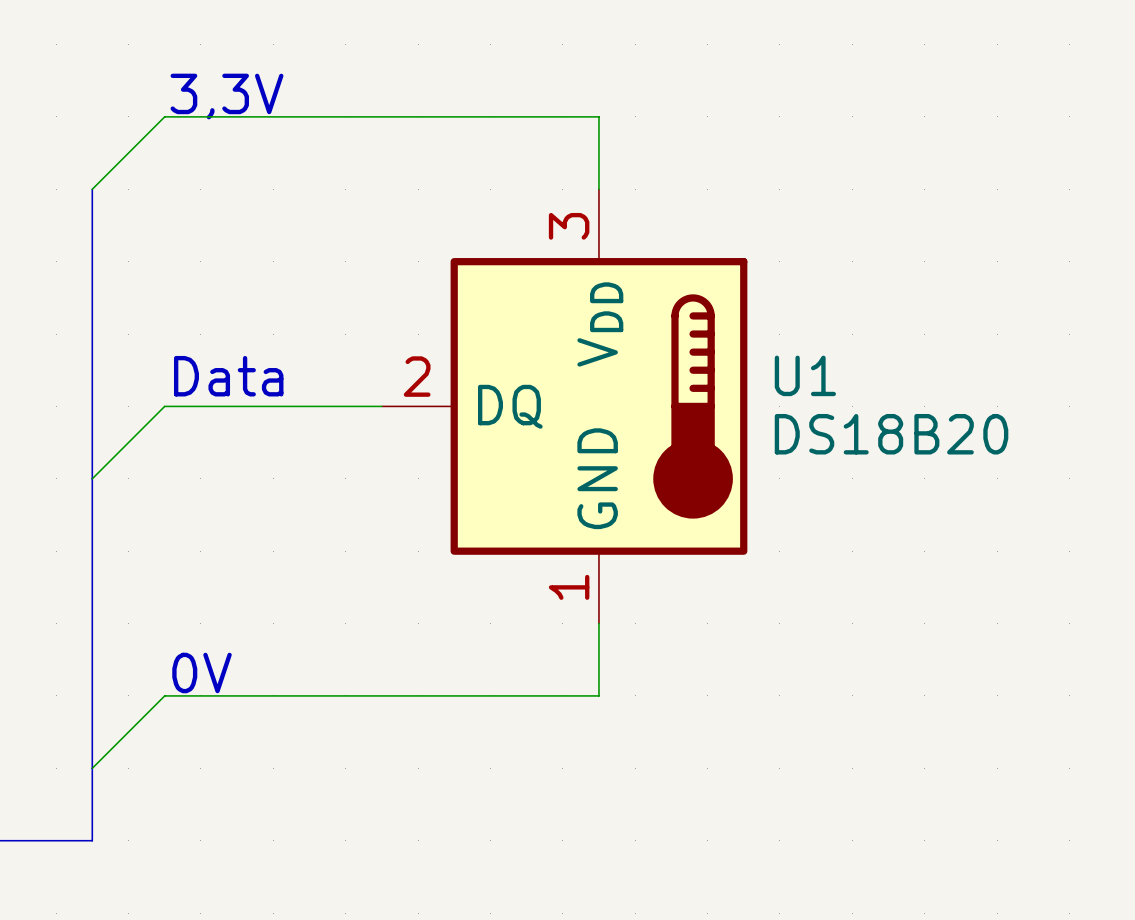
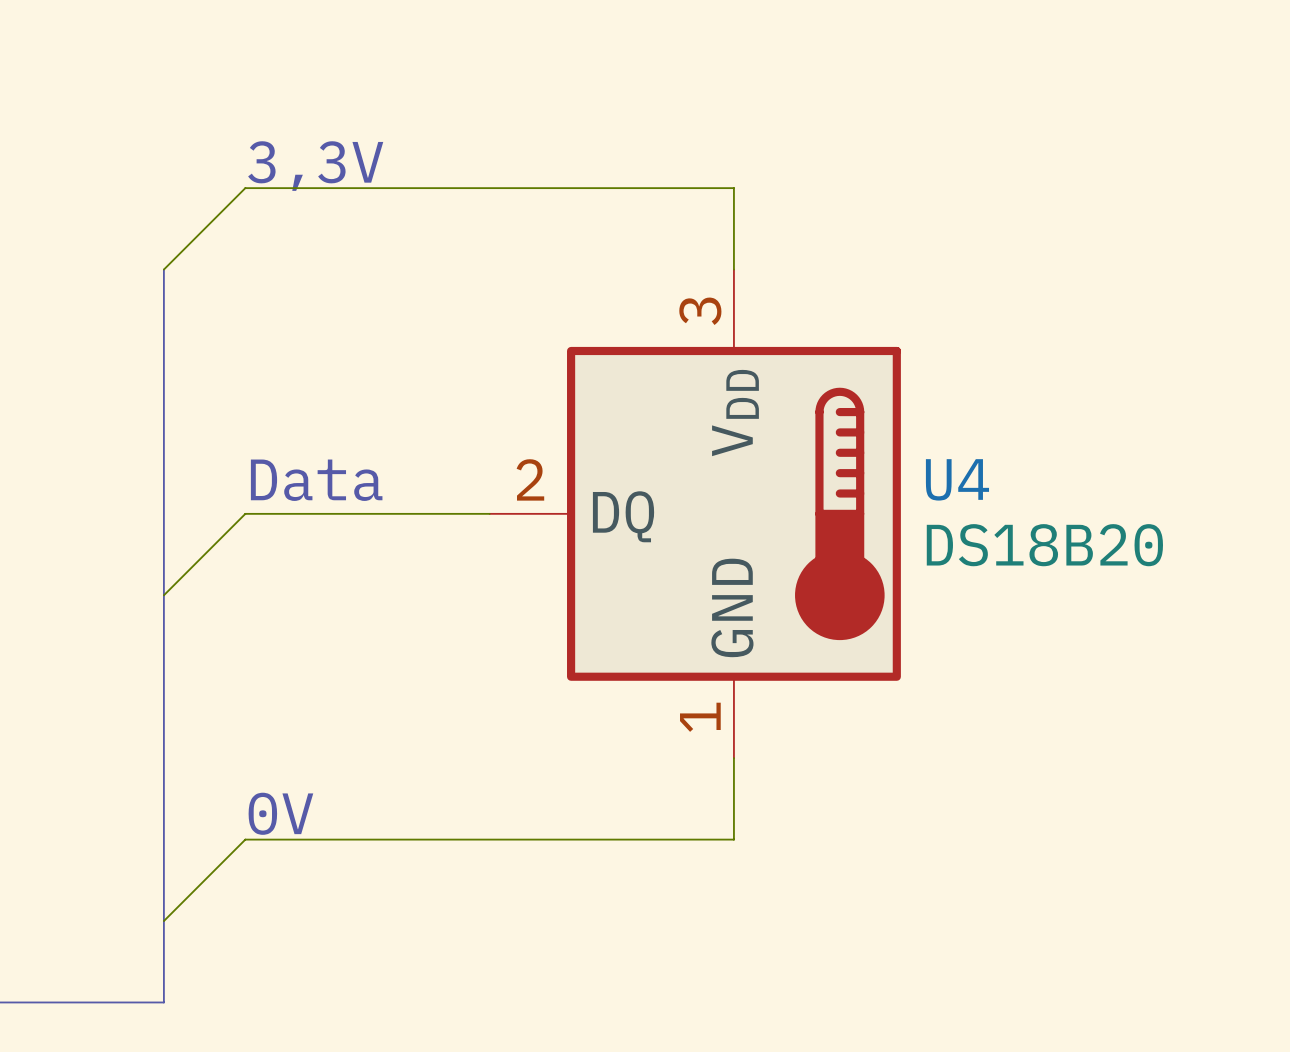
U1 name: U1 (805, 375) -> U4 (957, 479)

